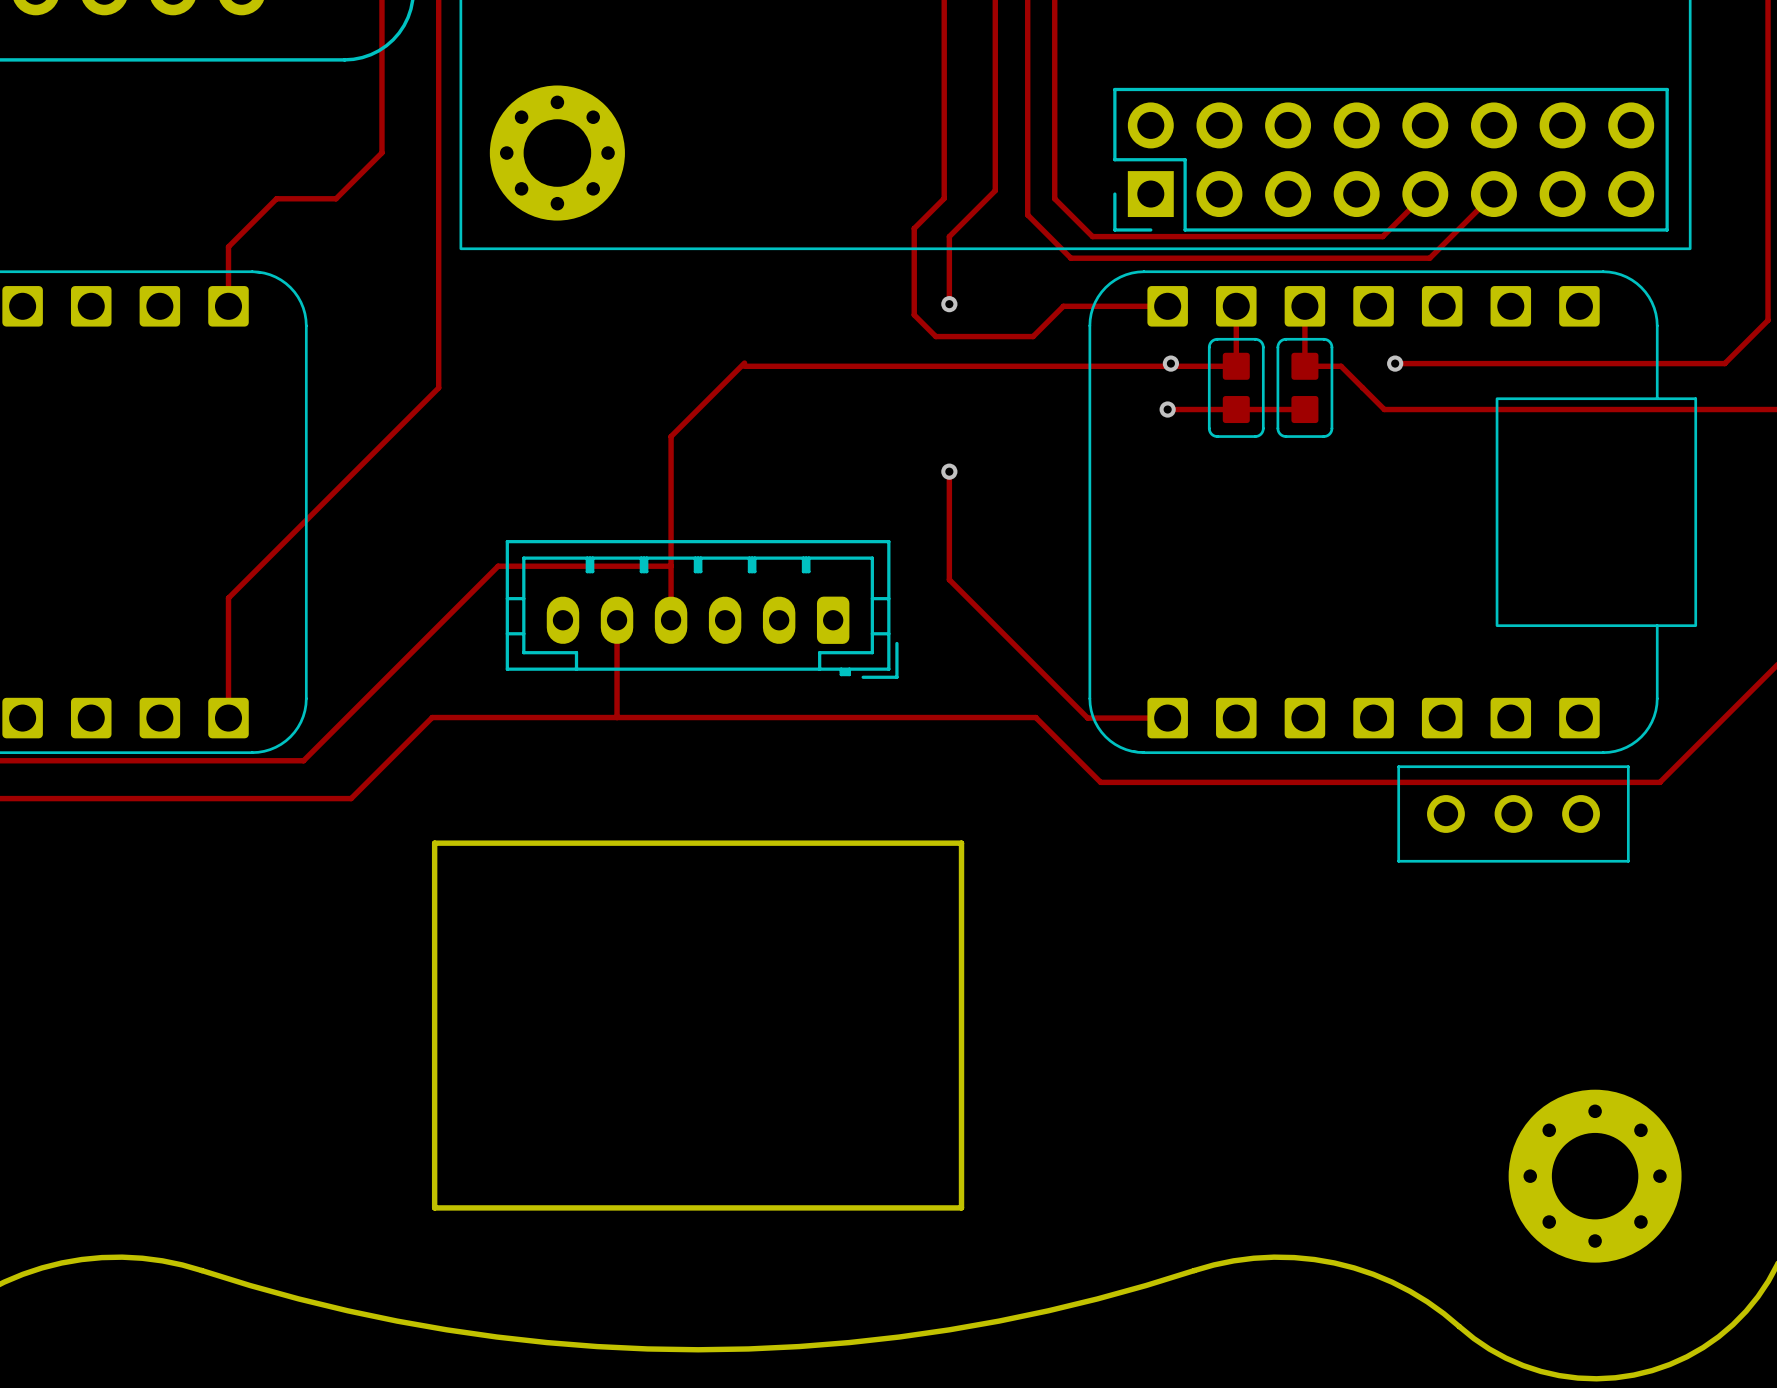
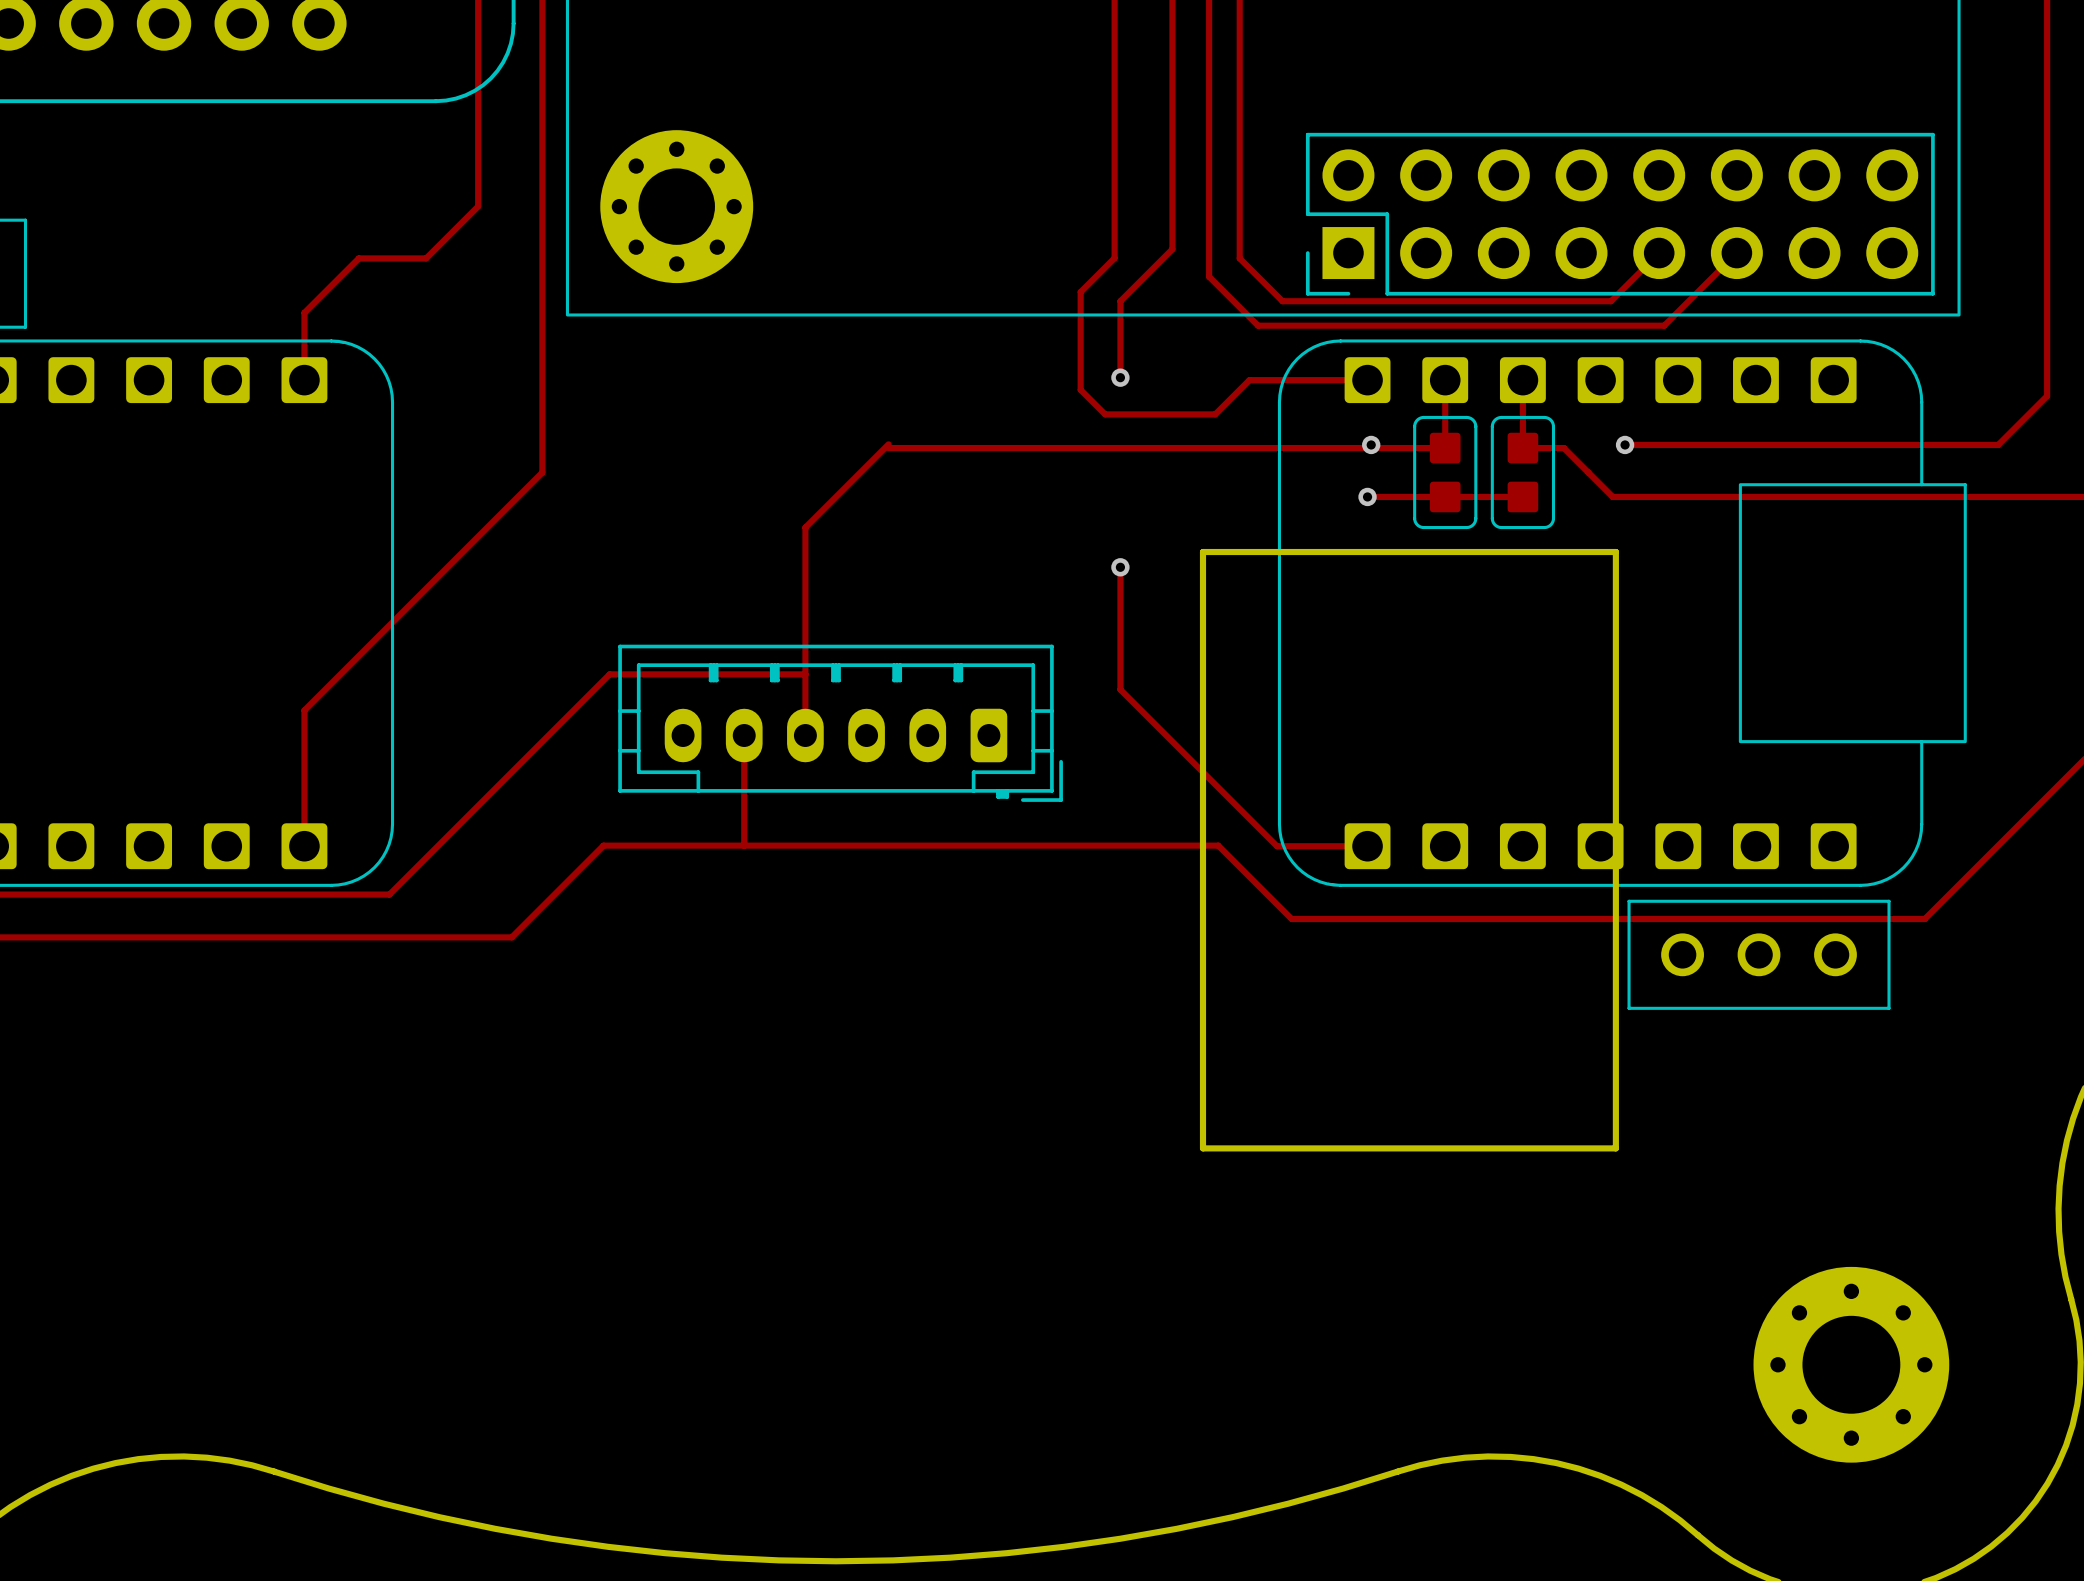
board edge: none -> (1203, 552) (1203, 1148) (1615, 1148) (1615, 552) (1203, 552)
track: (492, 717) (432, 717) (351, 798) -> (603, 845) (511, 937) (443, 937)
board edge: (434, 843) (434, 1207) (961, 1207) (961, 843) (434, 843) -> none

